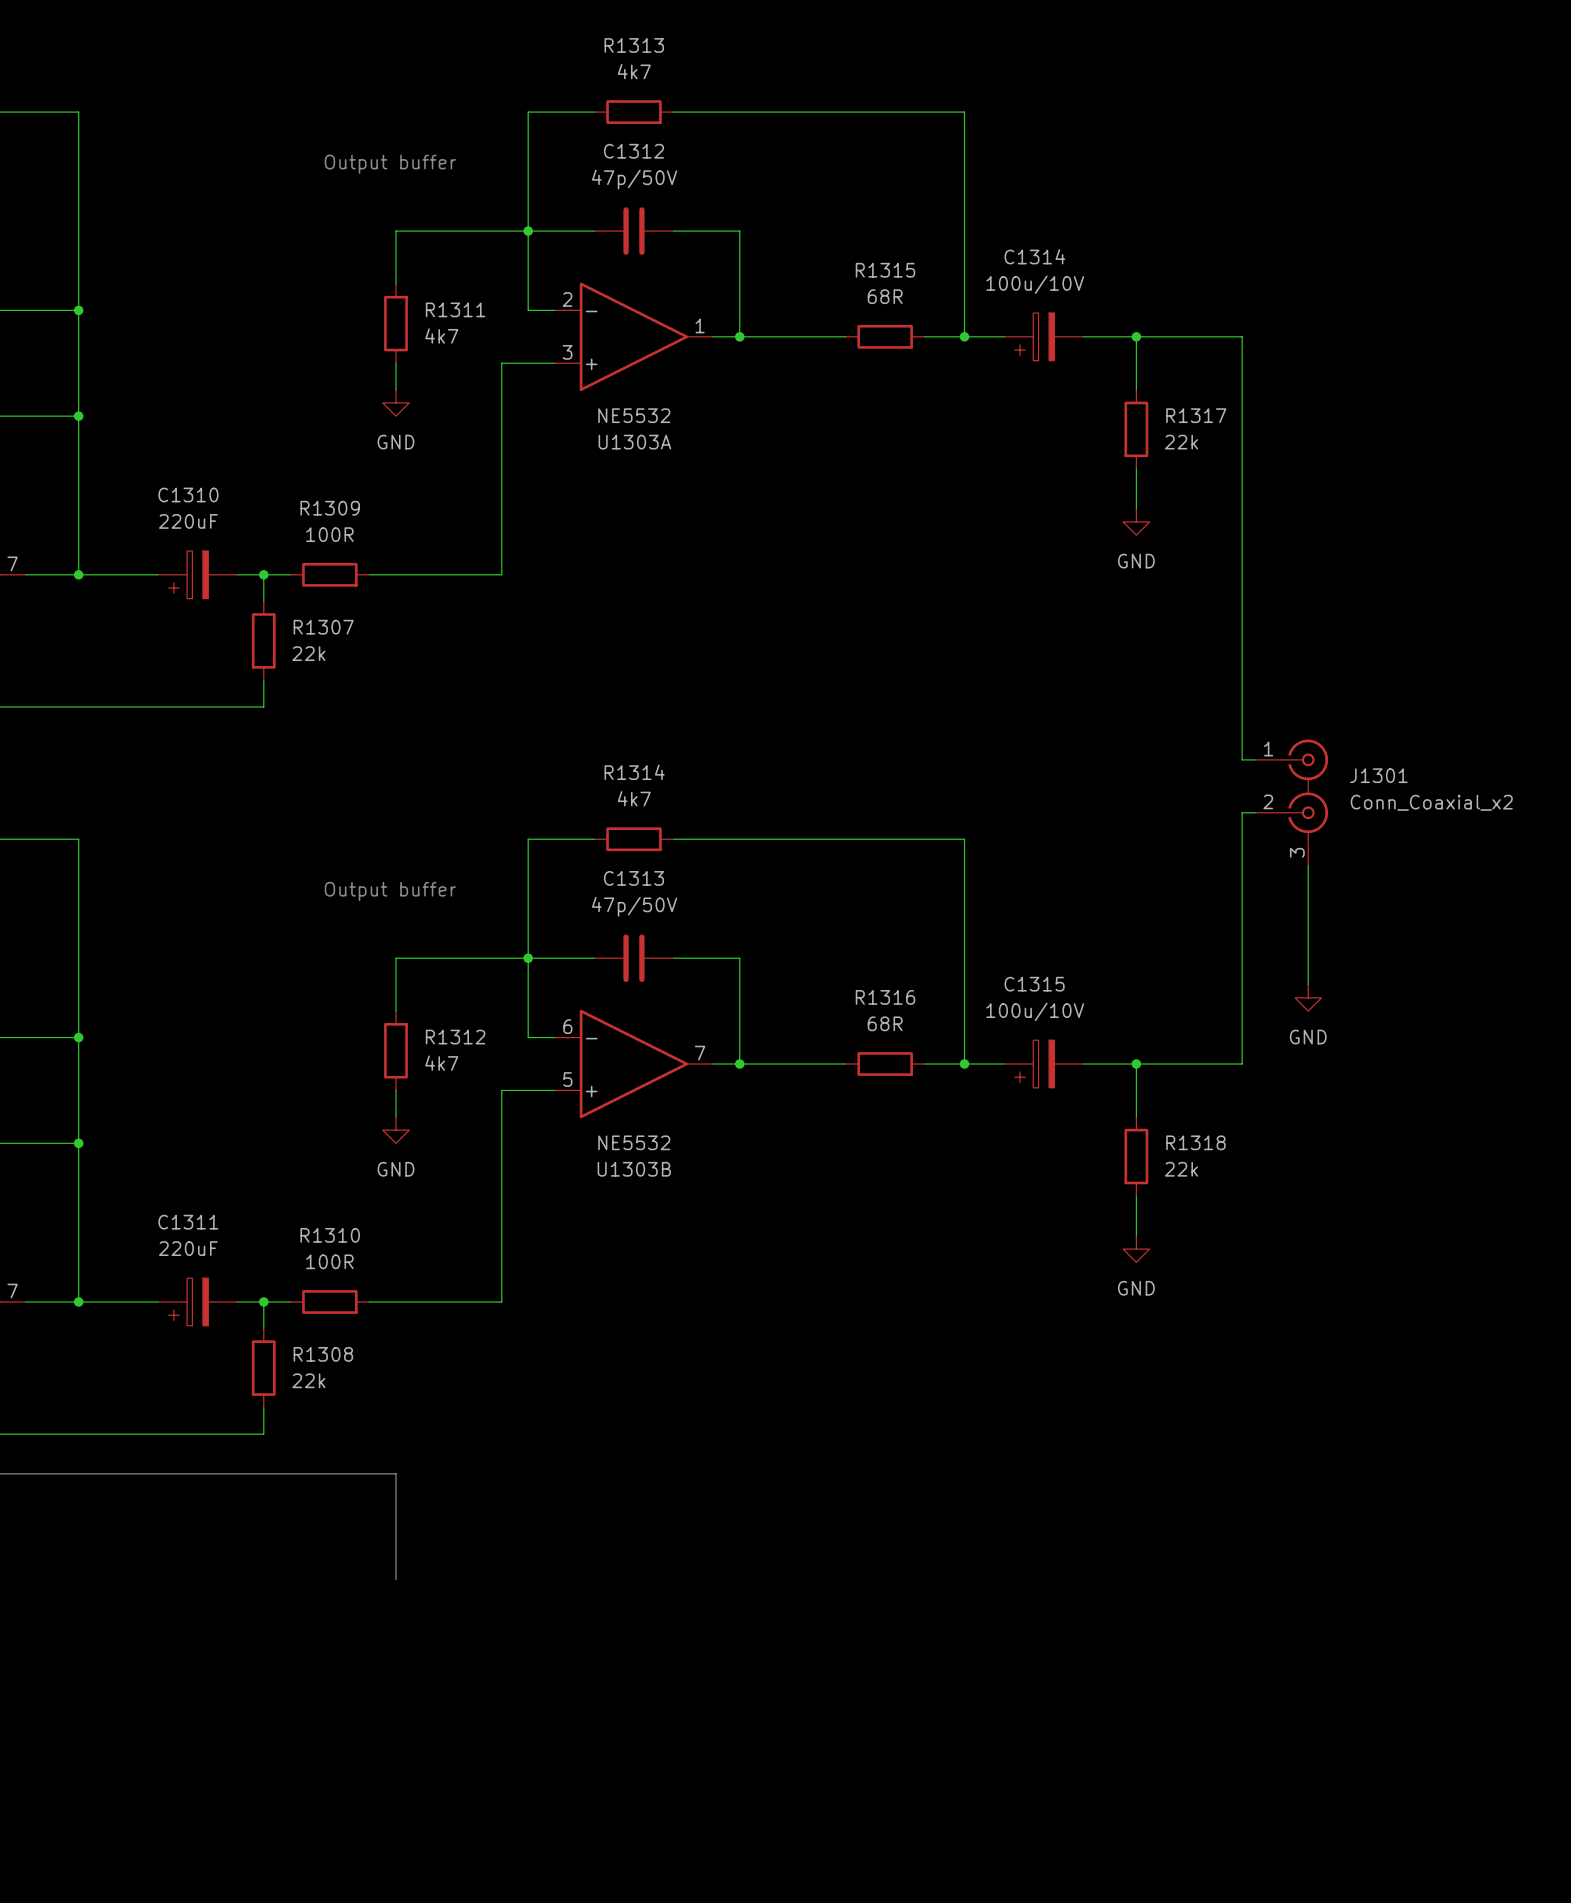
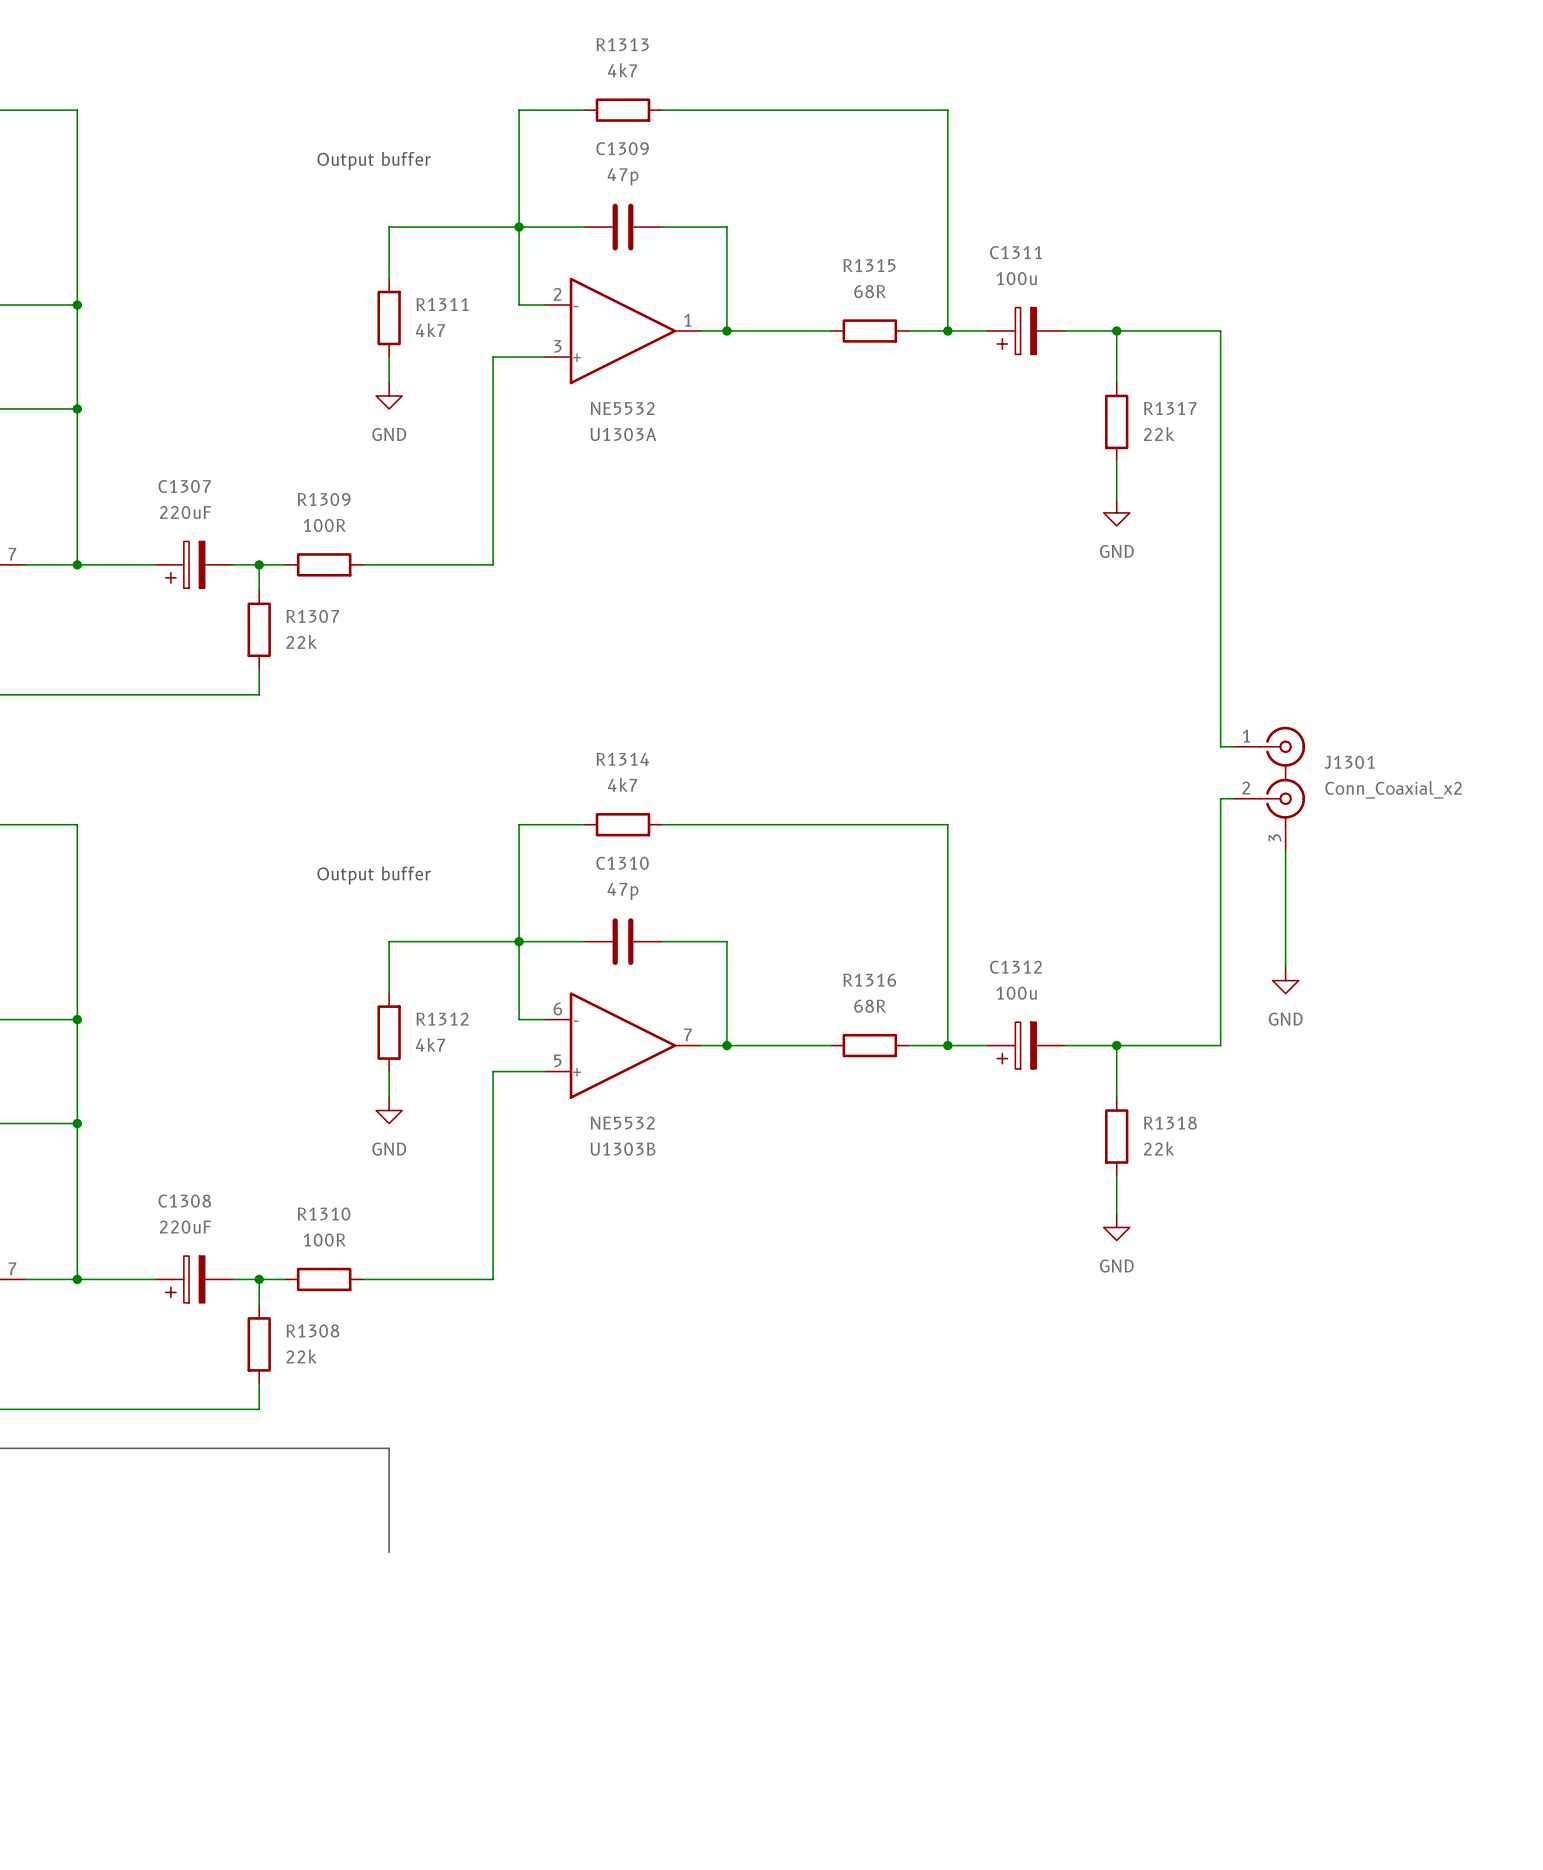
C1312 name: C1312 (633, 151) -> C1309 (622, 148)
C1312 value: 47p/50V (634, 179) -> 47p (623, 176)
C1314 name: C1314 (1034, 256) -> C1311 (1015, 252)
C1314 value: 100u/10V (1035, 284) -> 100u (1016, 278)
C1310 name: C1310 (188, 494) -> C1307 (184, 486)
C1313 name: C1313 (633, 878) -> C1310 (622, 863)
C1313 value: 47p/50V (634, 906) -> 47p (623, 891)
C1315 name: C1315 (1034, 984) -> C1312 (1016, 967)
C1315 value: 100u/10V (1035, 1011) -> 100u (1016, 993)
C1311 name: C1311 (188, 1222) -> C1308 (184, 1201)

